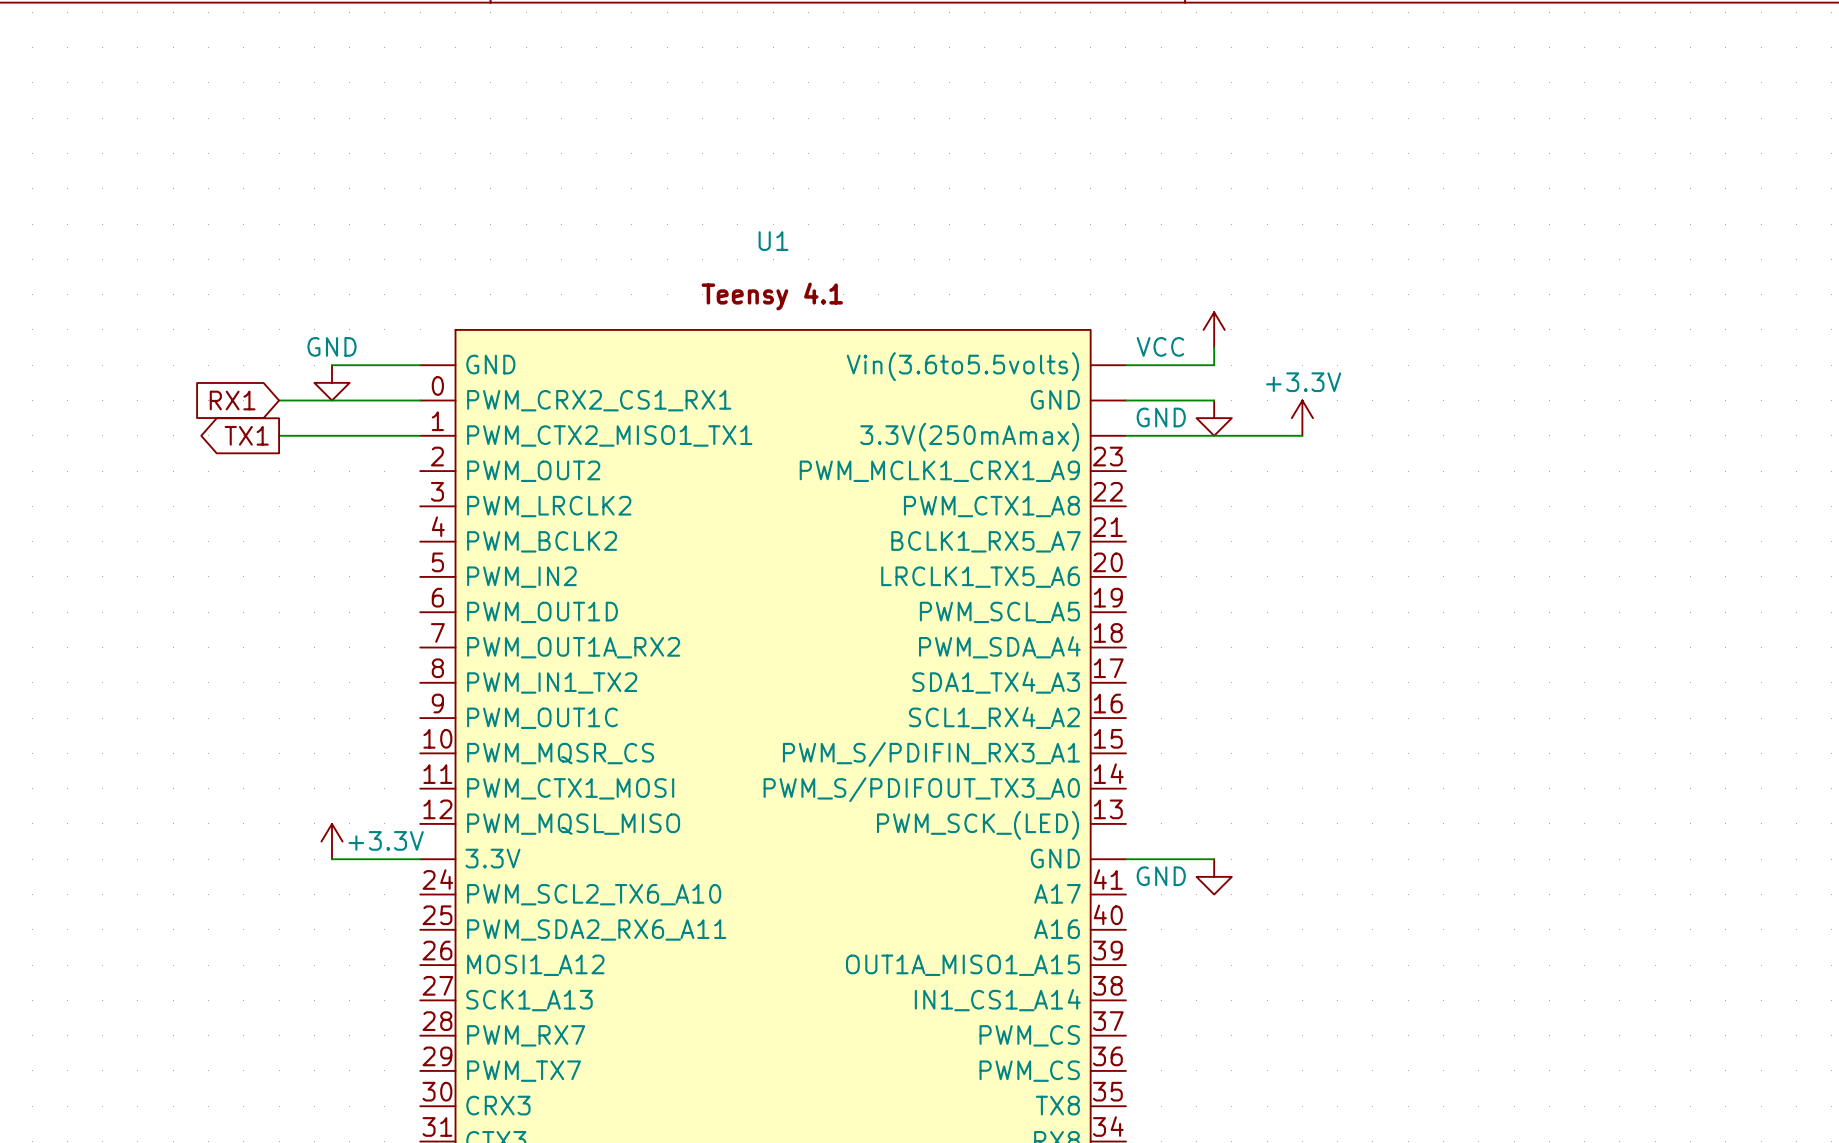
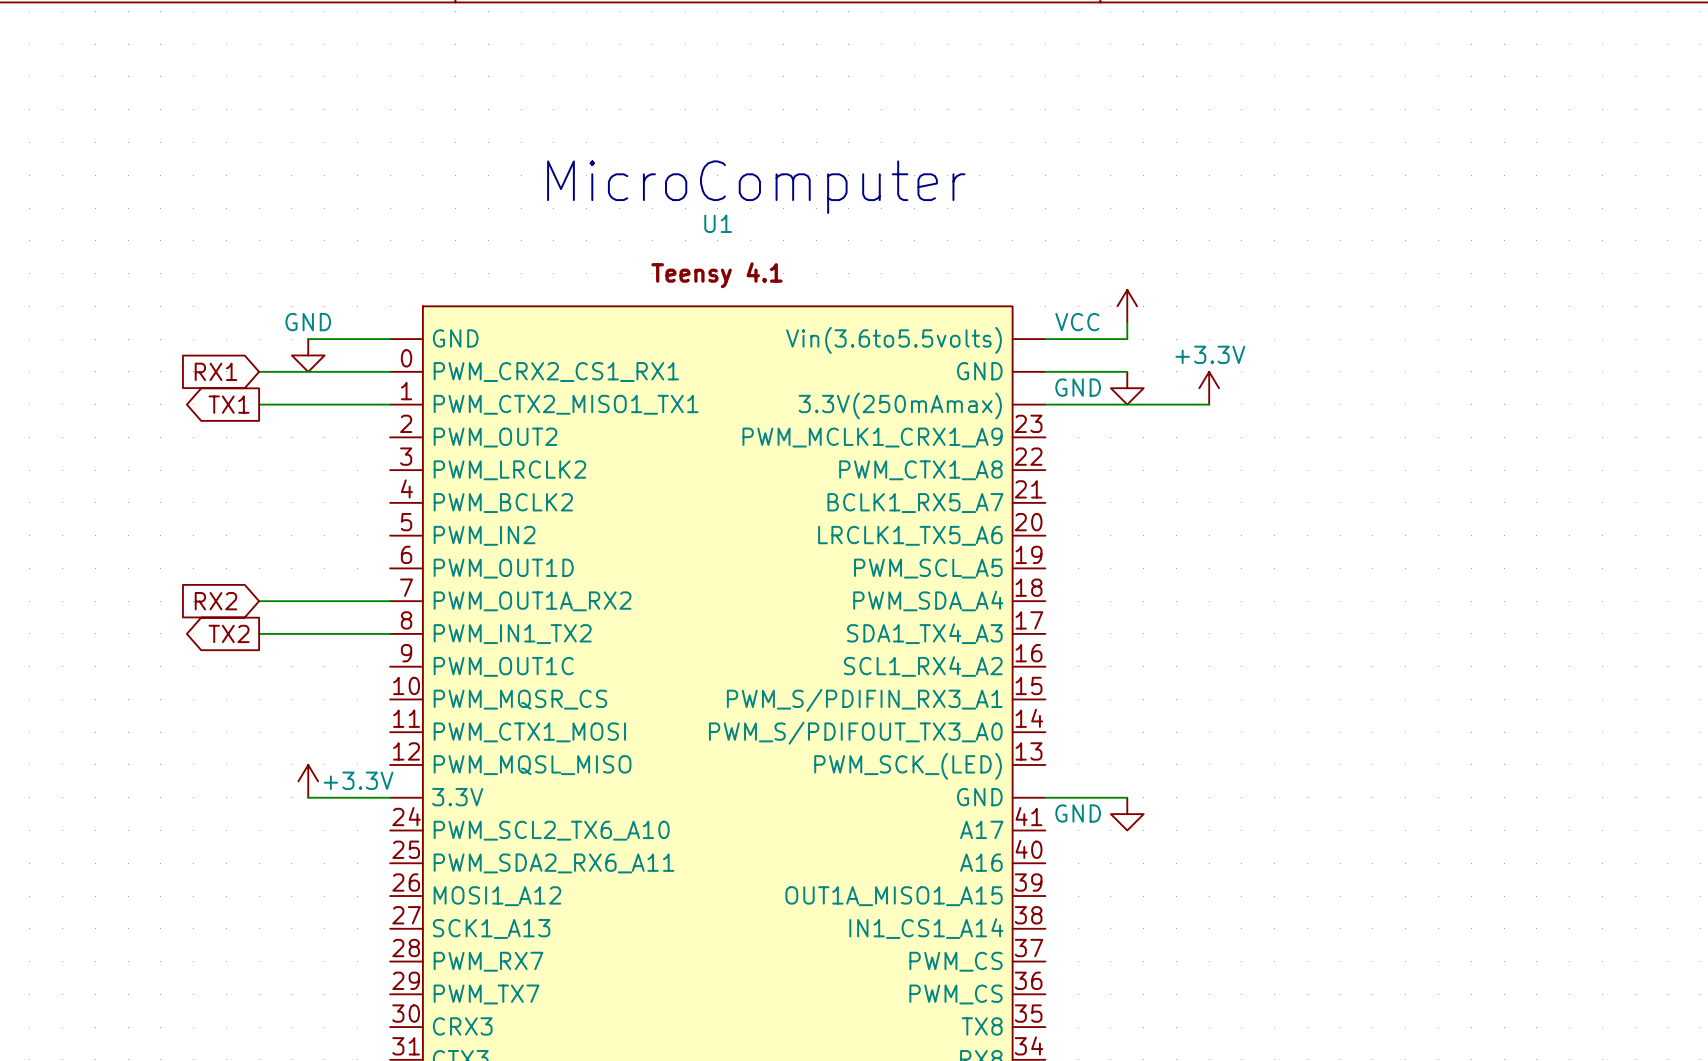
text: none -> MicroComputer (756, 187)
global label: none -> RX2 (215, 601)
wire: none -> (259, 601) (390, 601)
global label: none -> TX2 (229, 633)
wire: none -> (259, 633) (390, 633)

